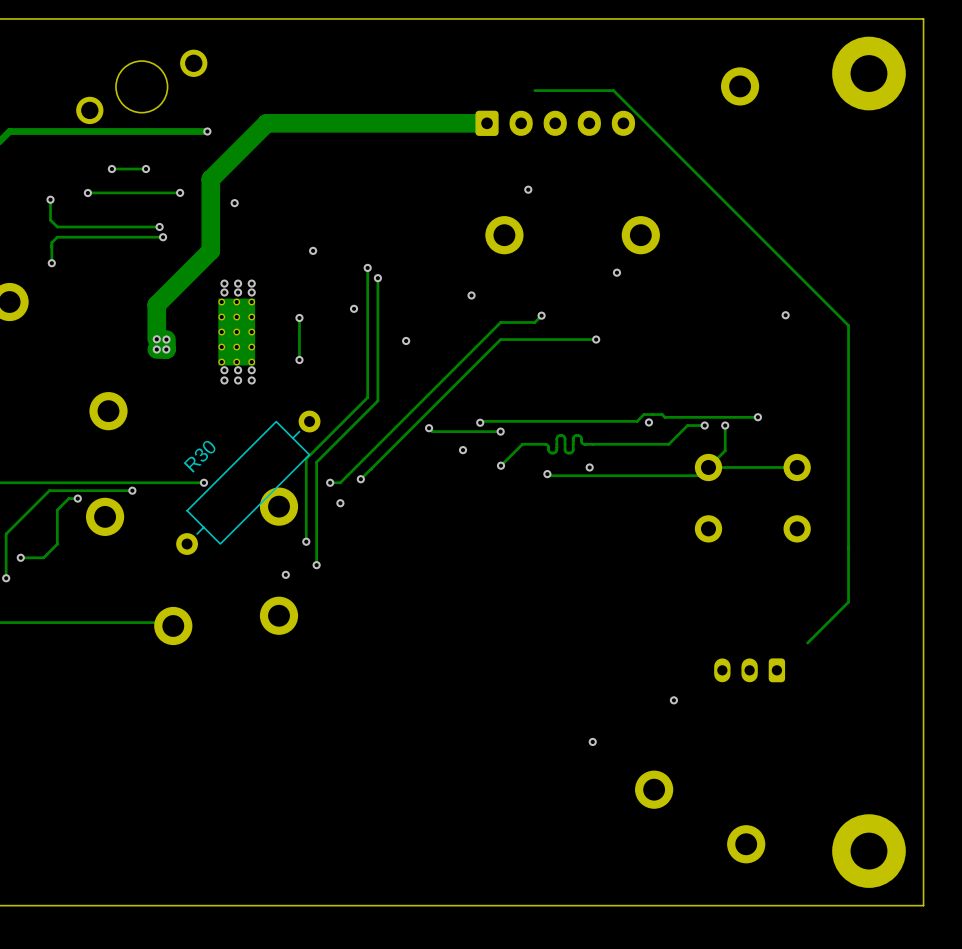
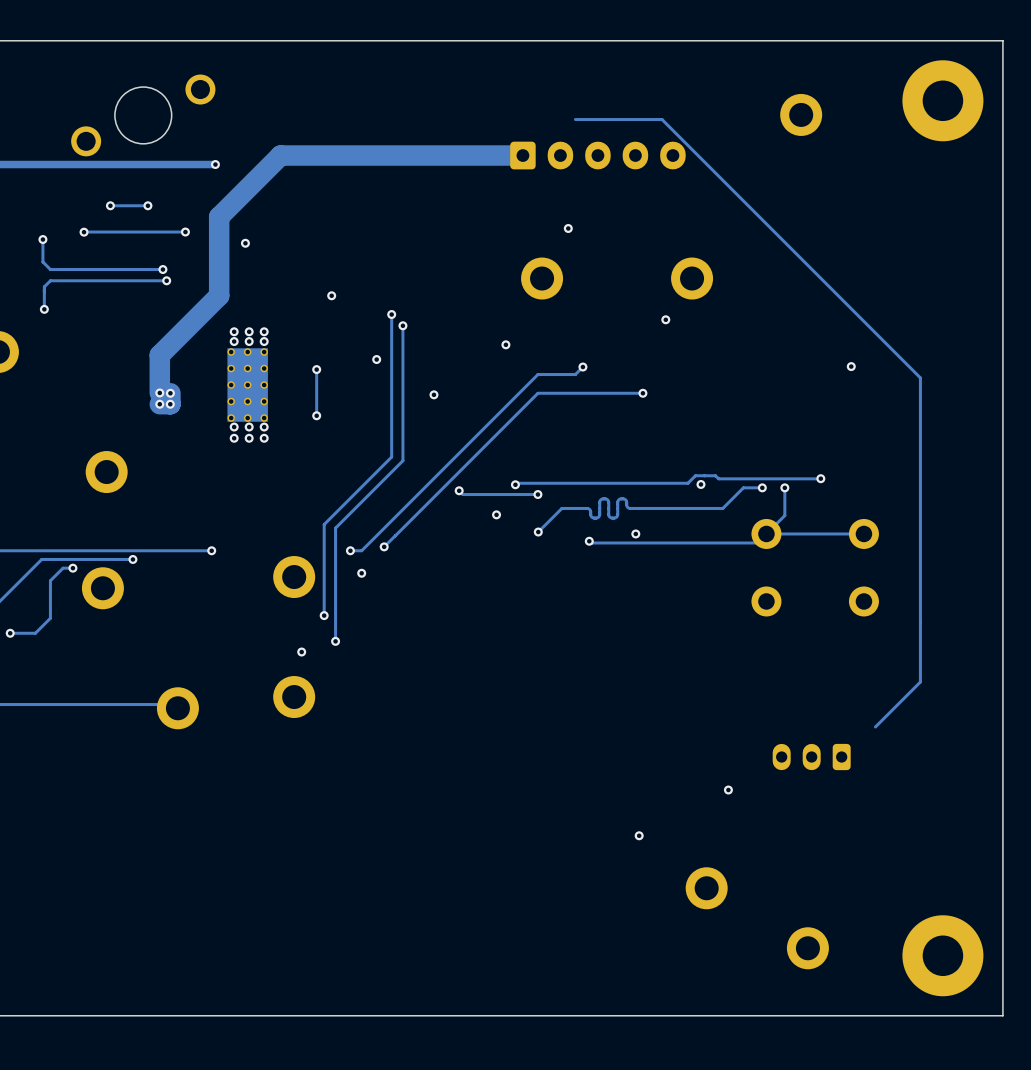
R30: (248, 482) -> none

